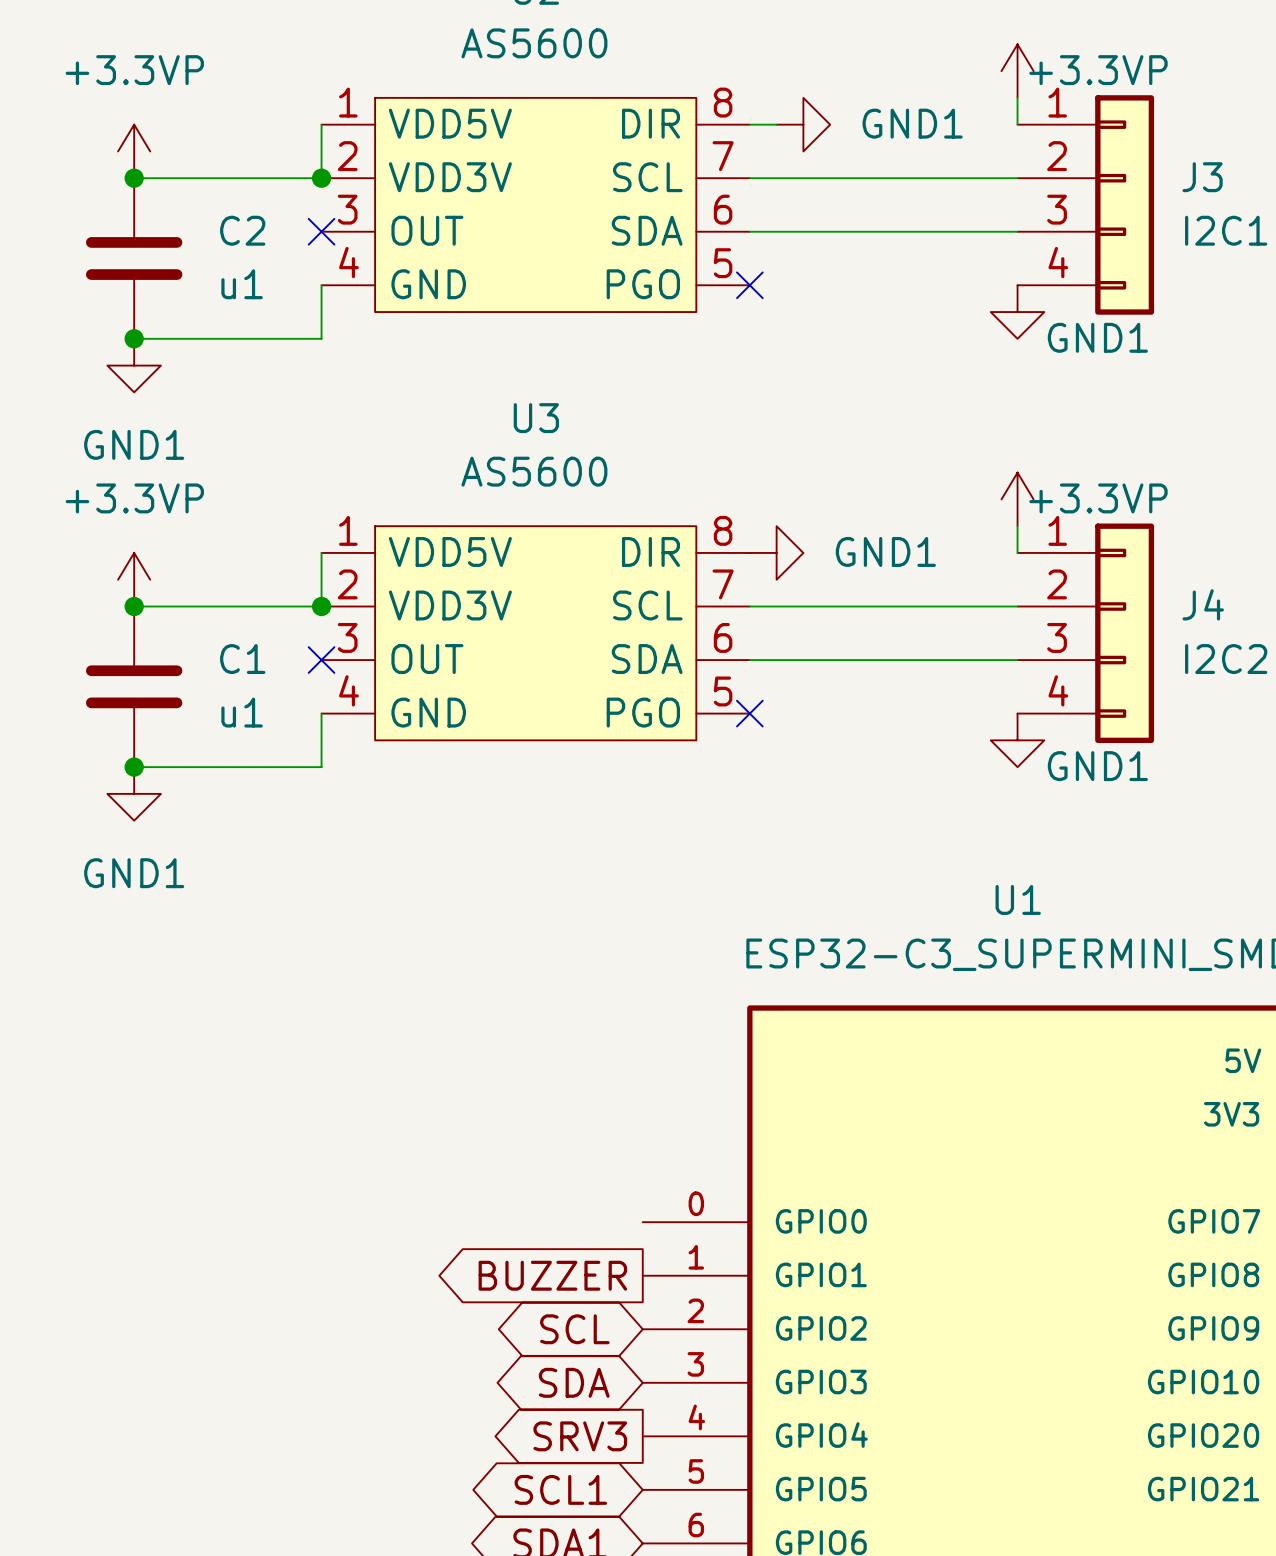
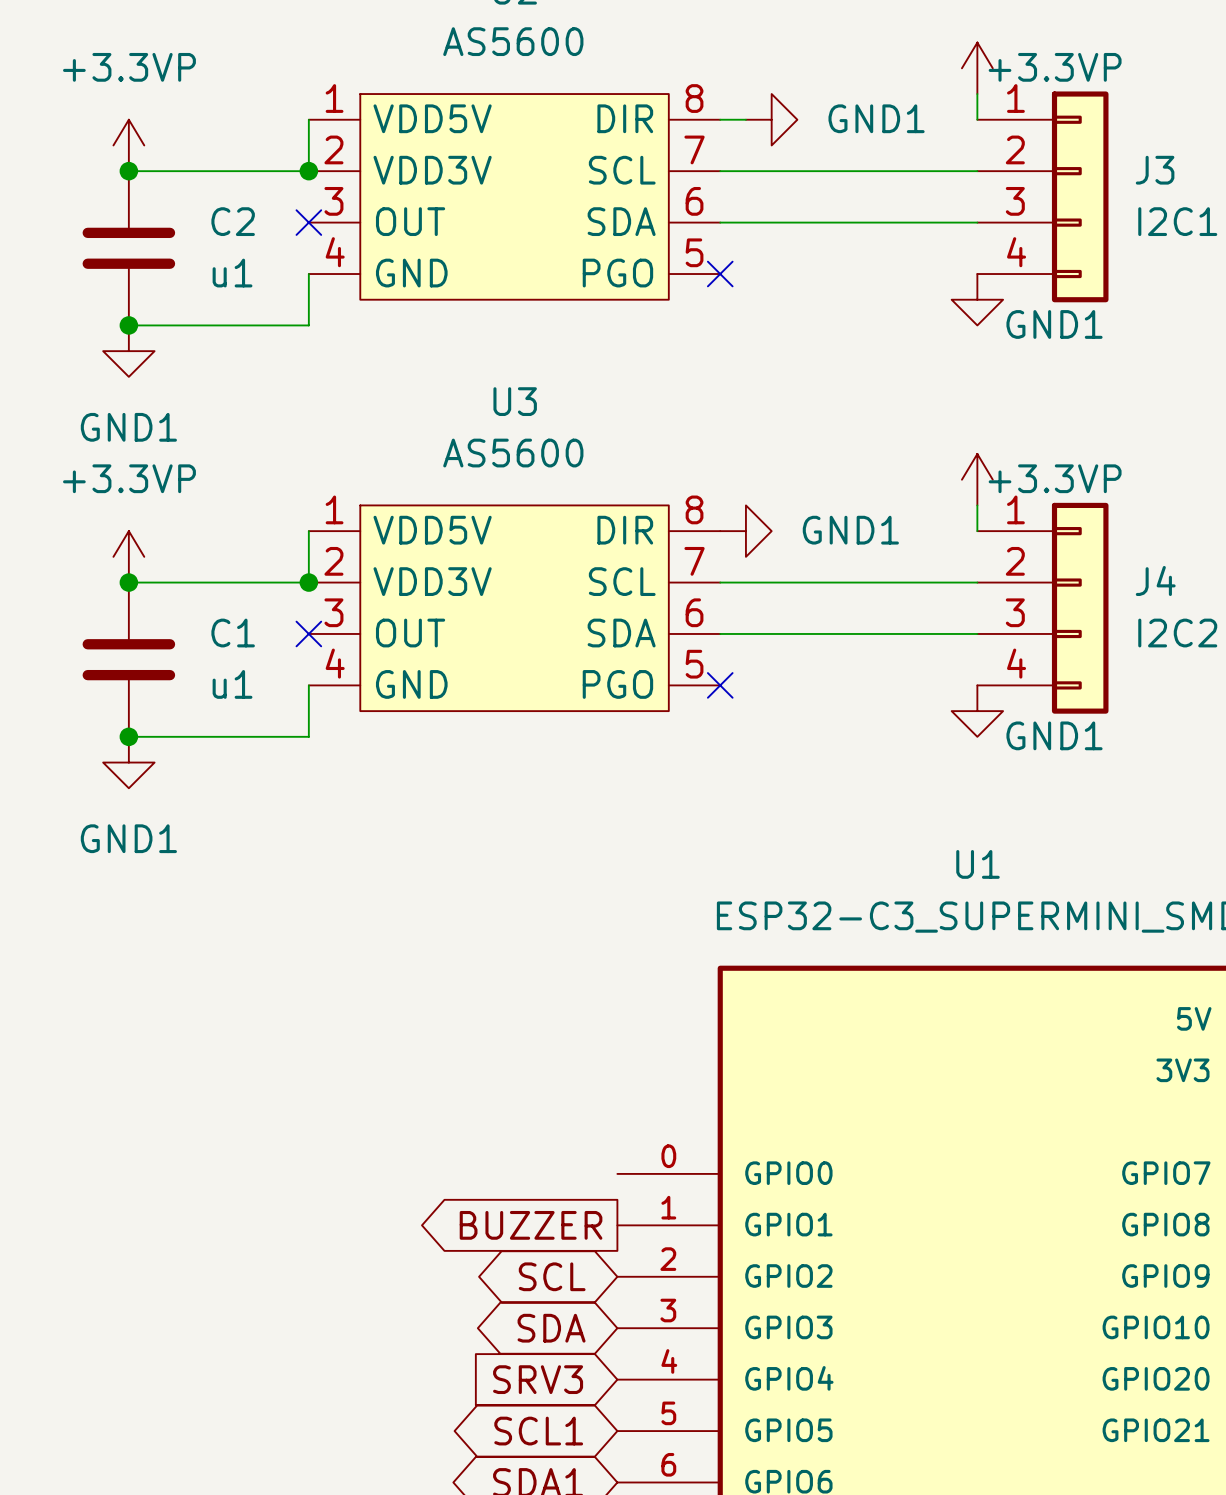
global label shape: output (580, 1436) -> input (538, 1379)

